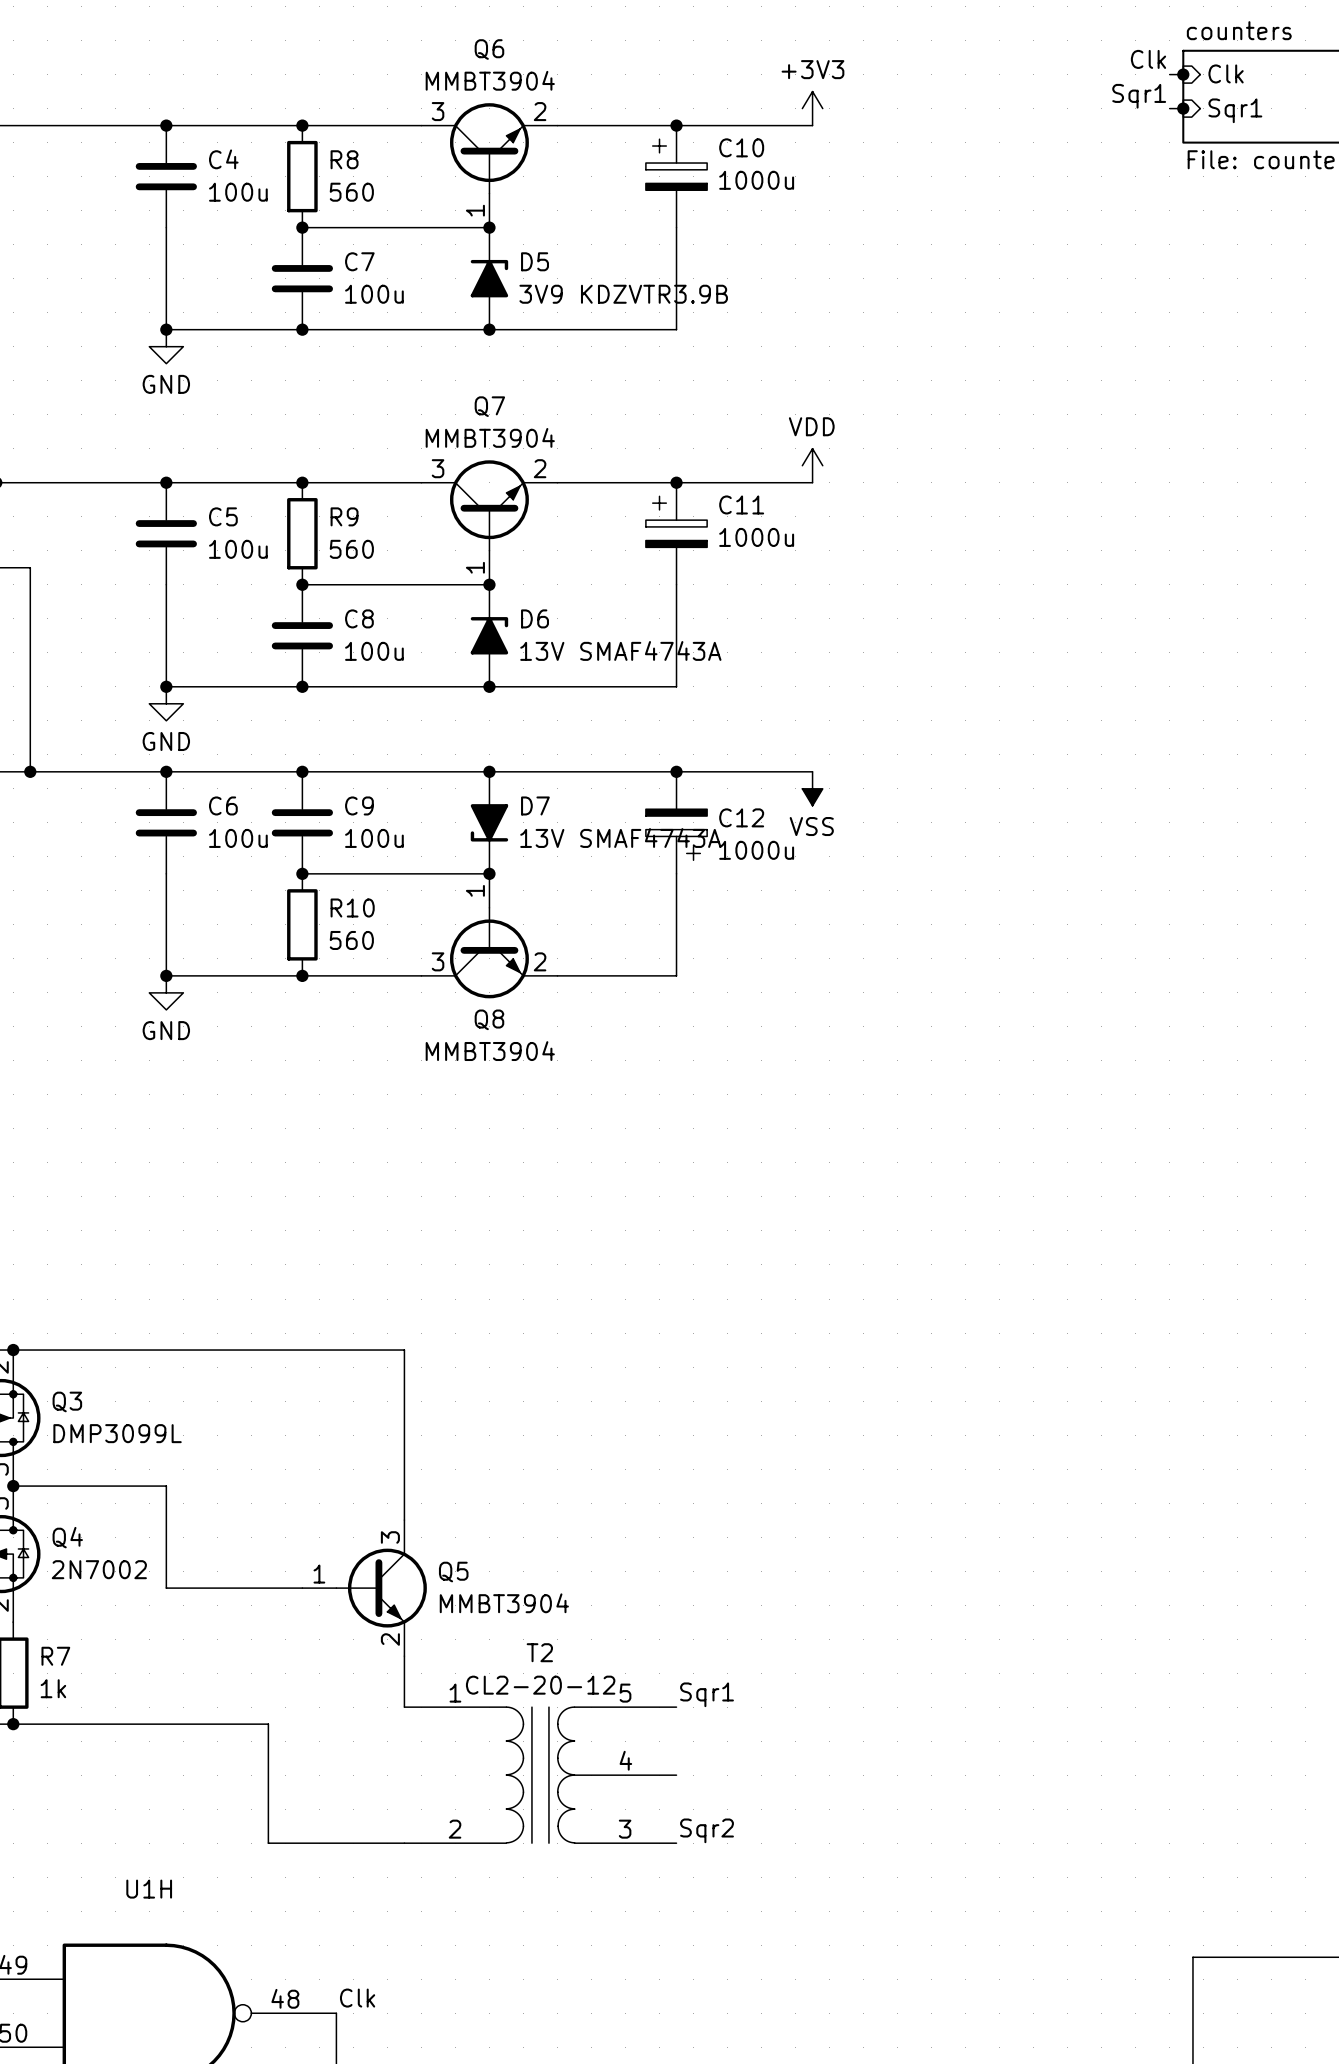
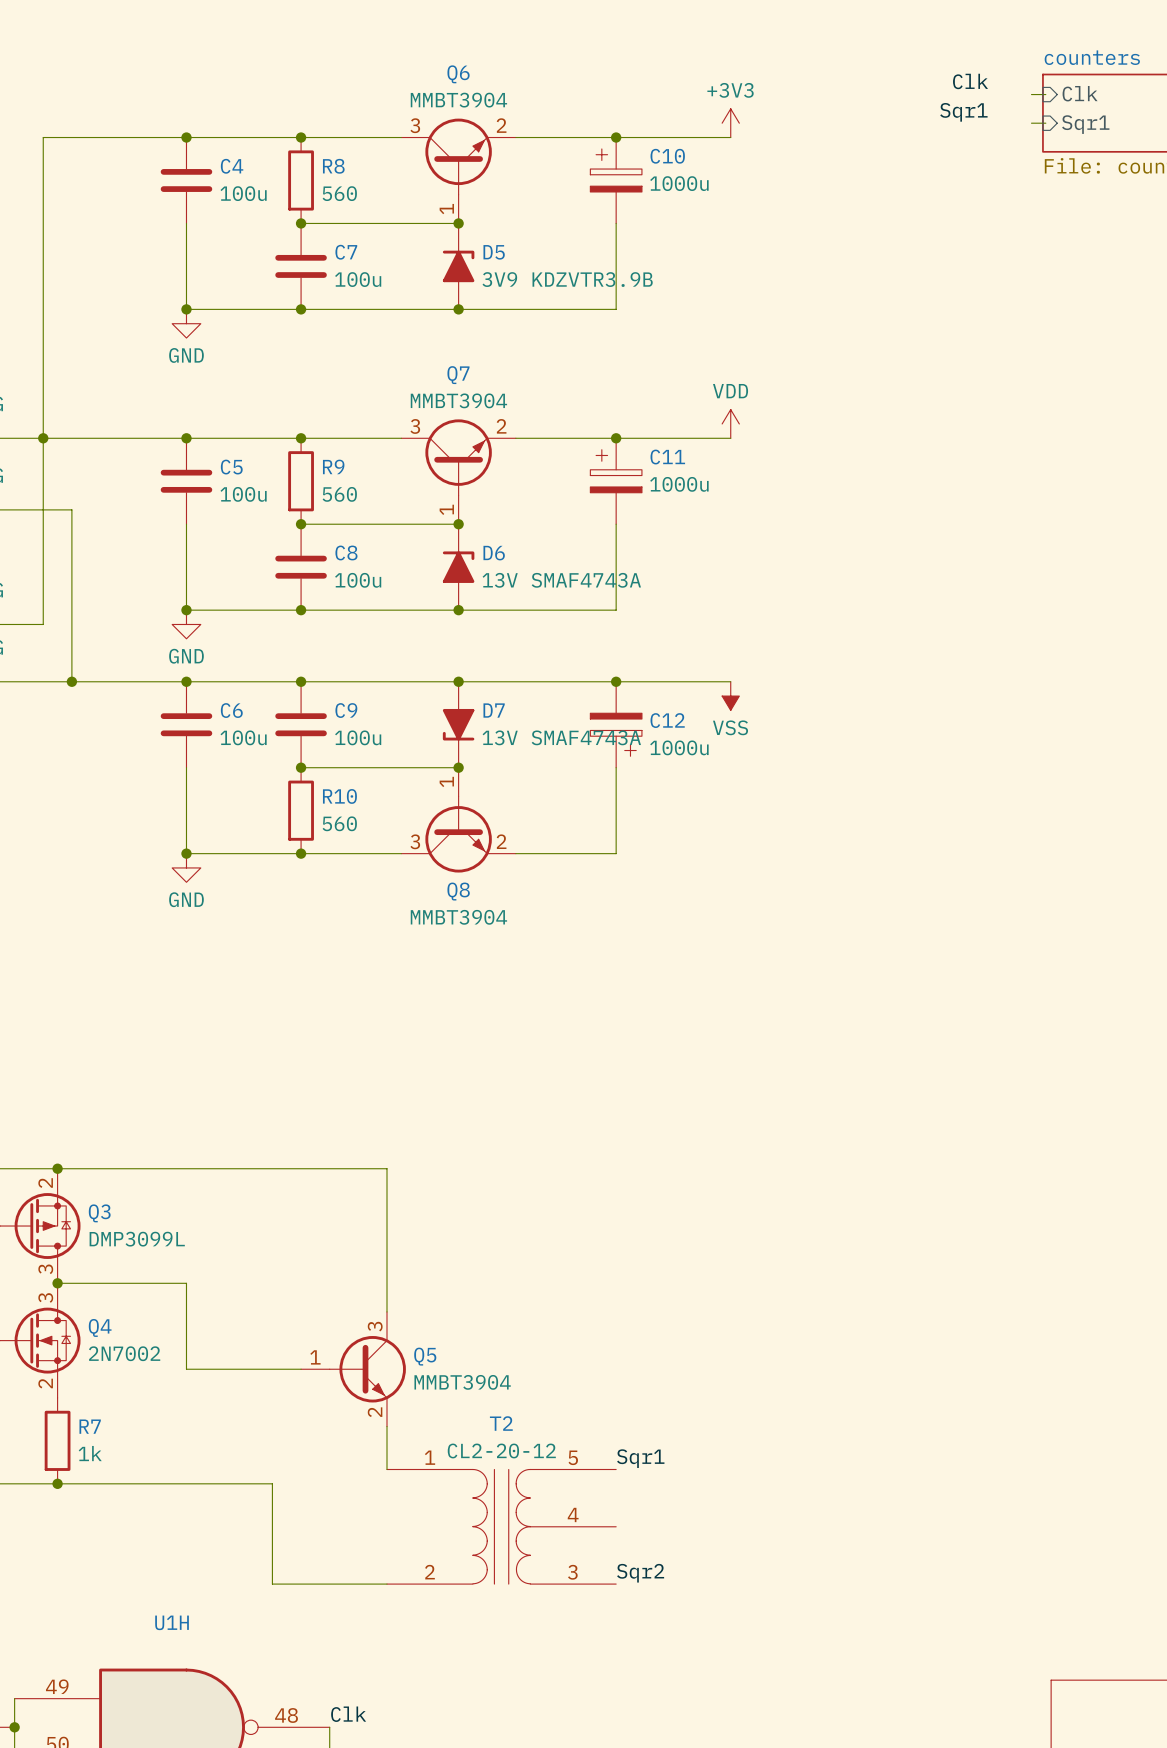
label position: Clk (1148, 59) -> Clk (970, 81)
junction: (1183, 74) -> none
label position: Sqr1 (1139, 96) -> Sqr1 (963, 112)
junction: (1183, 108) -> none

